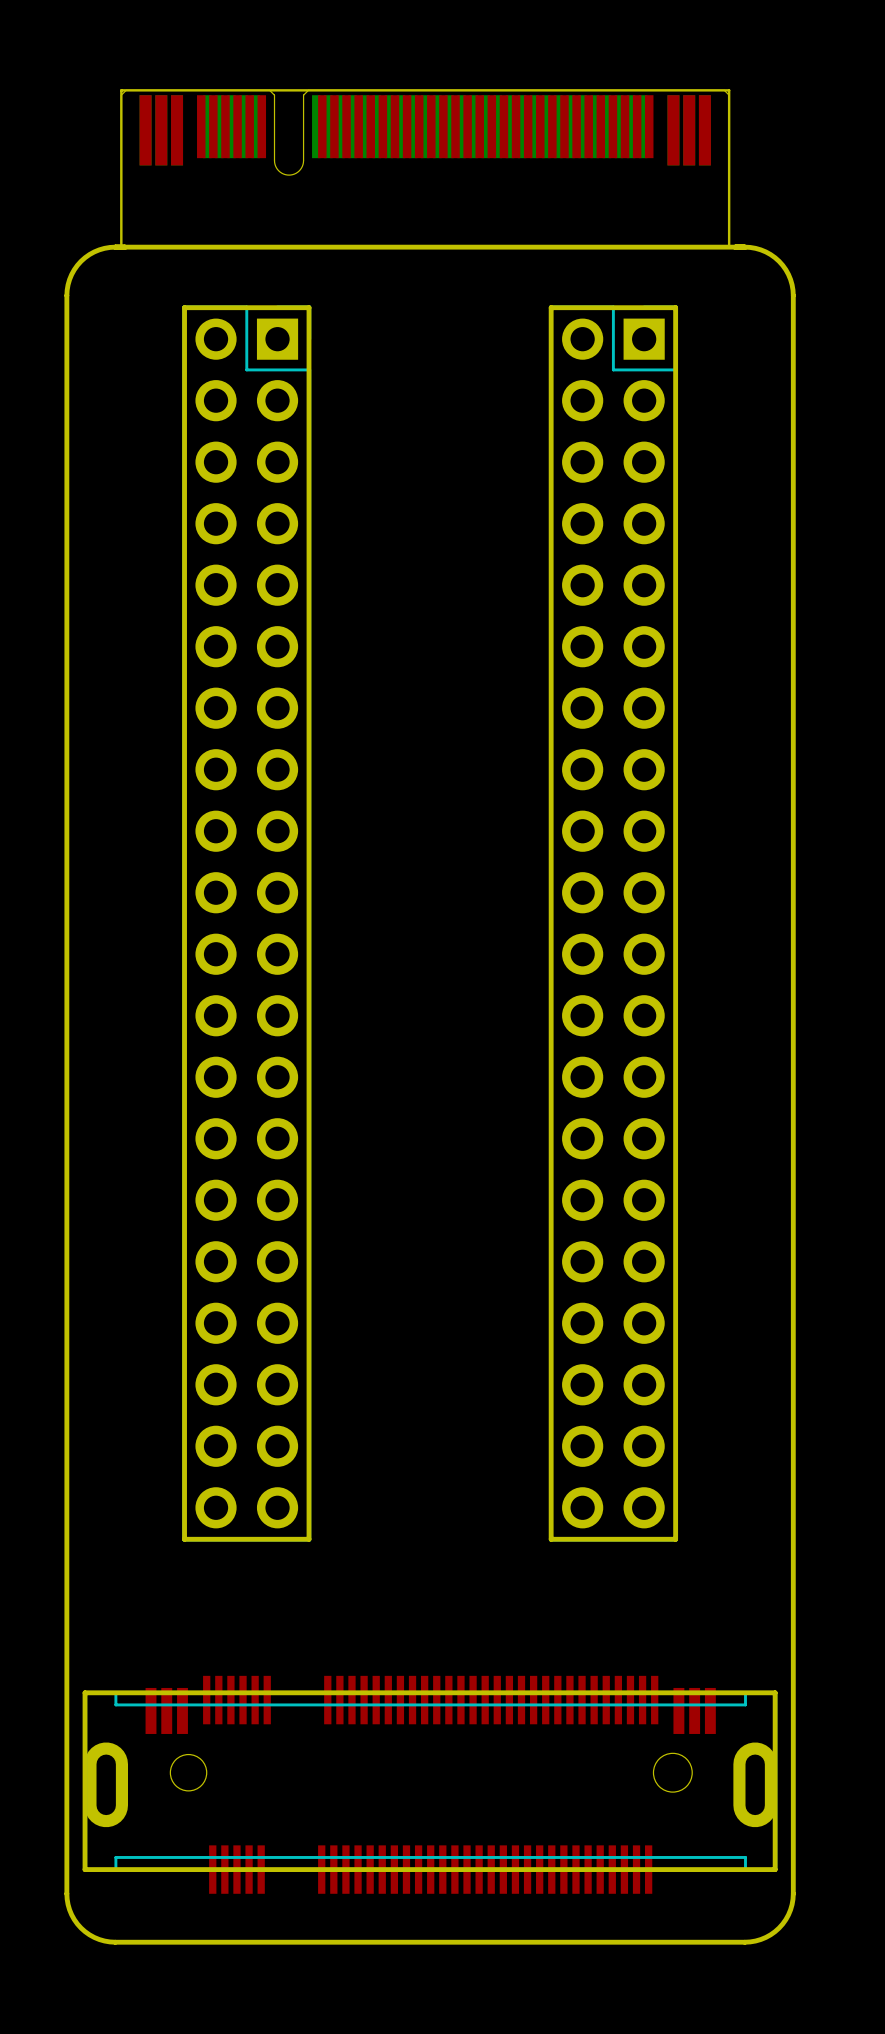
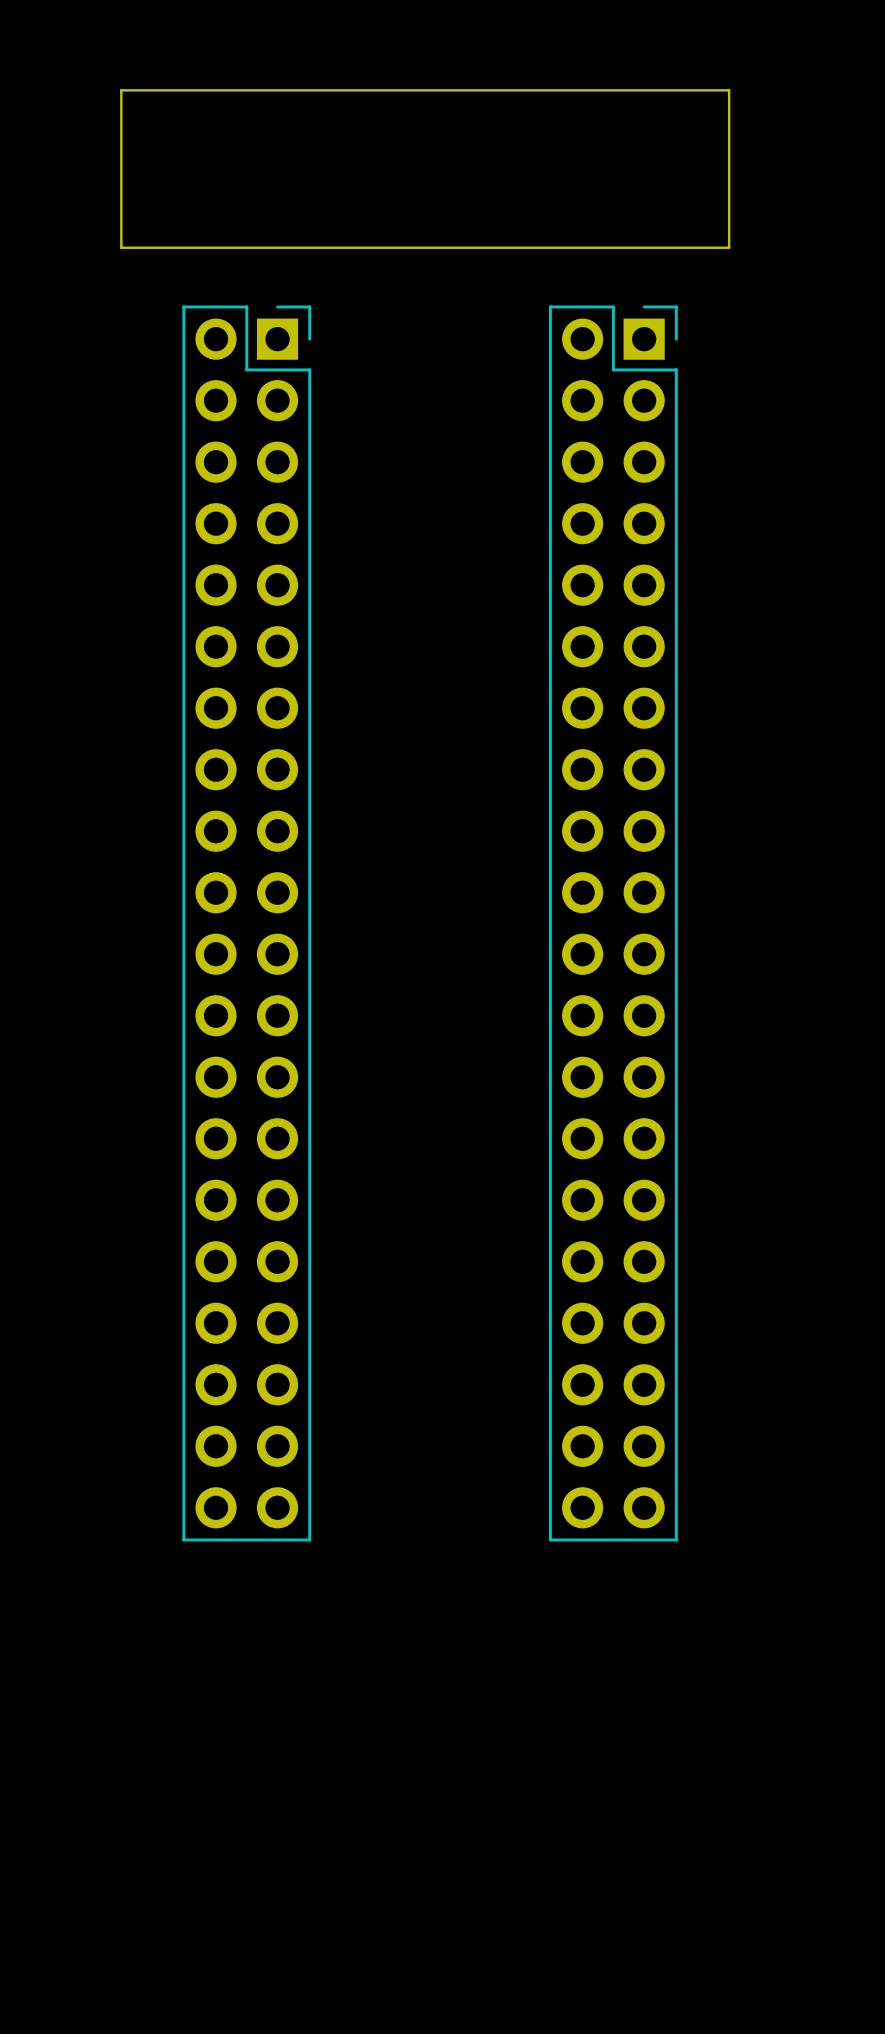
part: (425, 169) -> none
board edge: (115, 247) (744, 247) (755, 248) (770, 254) (782, 265) (790, 279) (793, 295) (793, 1893) (790, 1909) (782, 1923) (775, 1931) (760, 1939) (744, 1942) (115, 1942) (104, 1941) (89, 1934) (77, 1923) (69, 1909) (66, 1893) (66, 295) (71, 274) (81, 261) (94, 251) (115, 247) -> none
board edge: (184, 307) (309, 307) (309, 1539) (184, 1539) (184, 307) -> none
board edge: (551, 307) (675, 307) (675, 1539) (551, 1539) (551, 307) -> none
board edge: (85, 1692) (775, 1692) (775, 1869) (85, 1869) (85, 1692) -> none
part: (430, 1784) -> none

